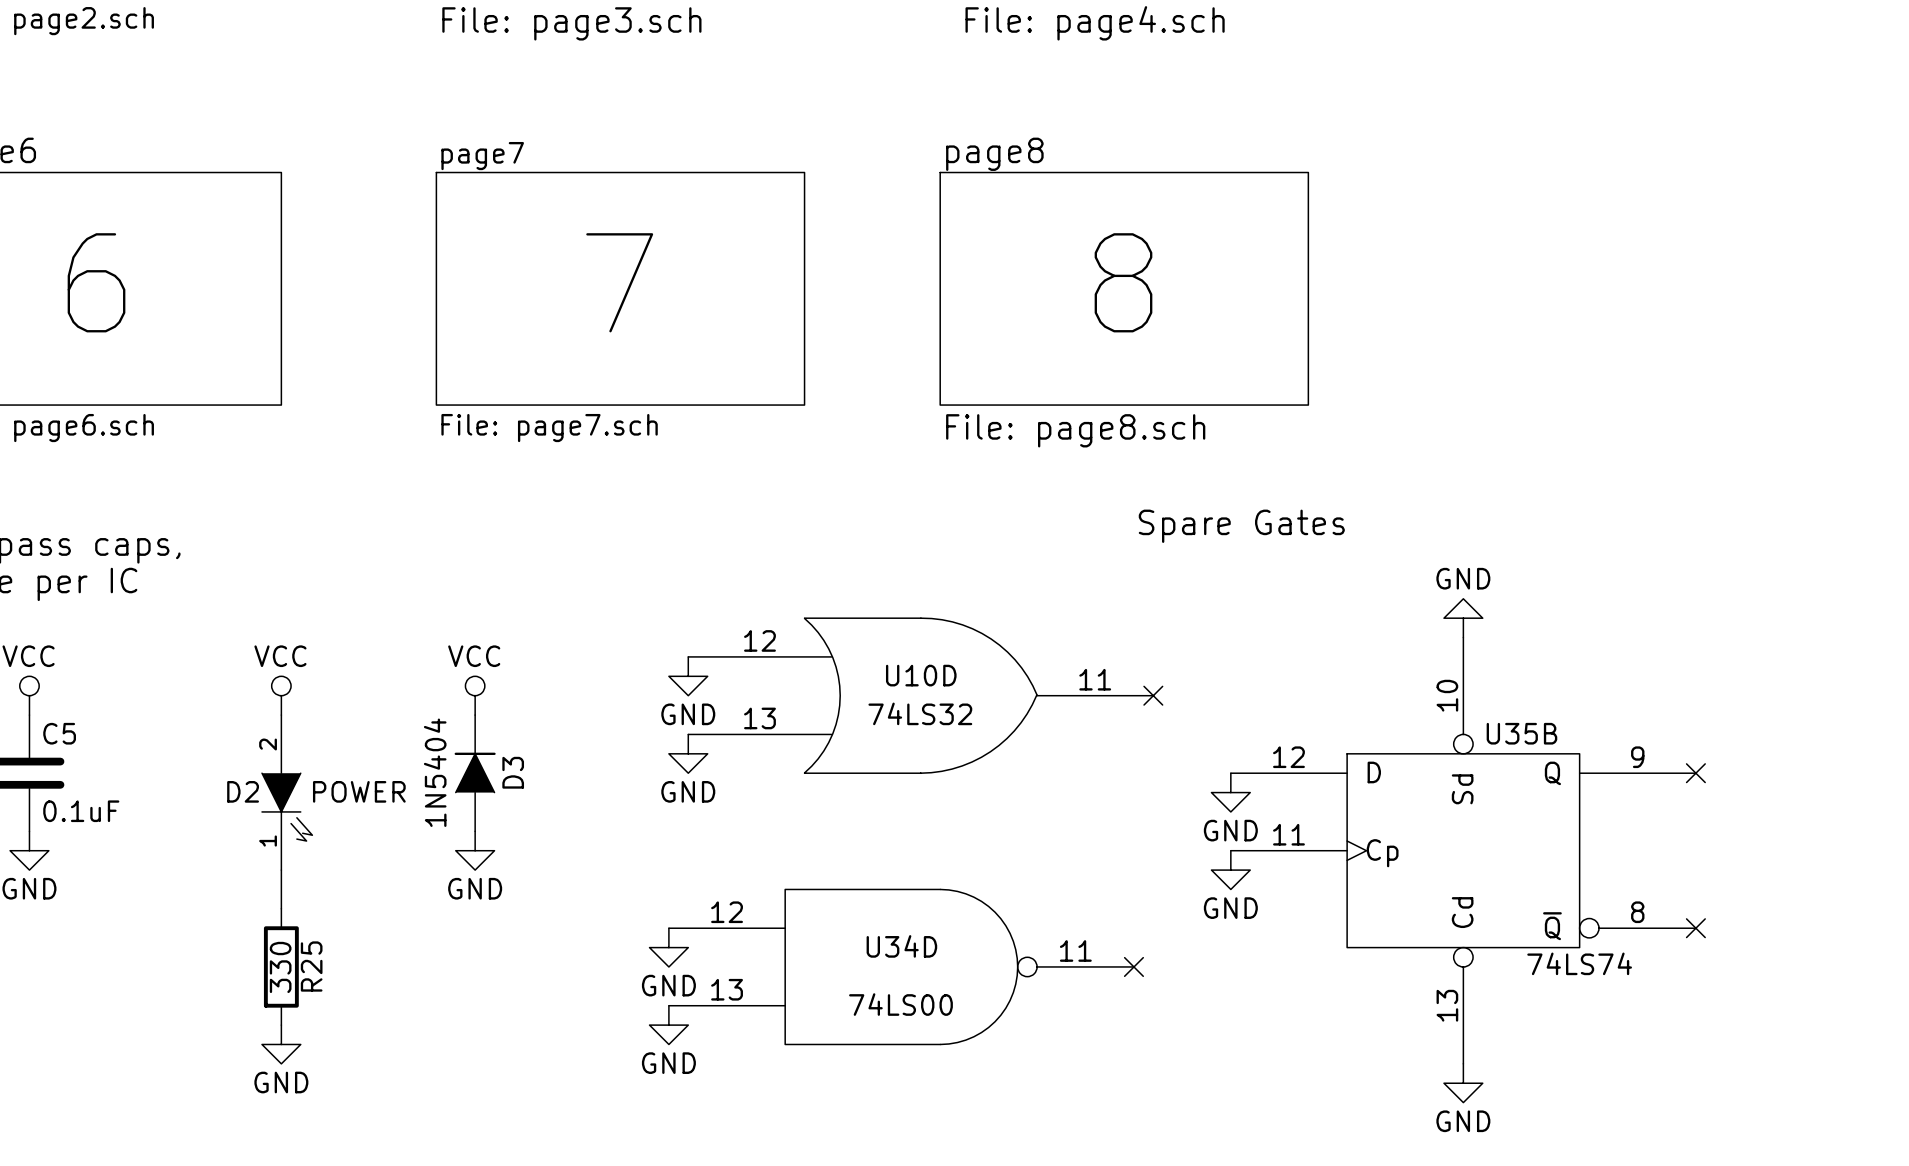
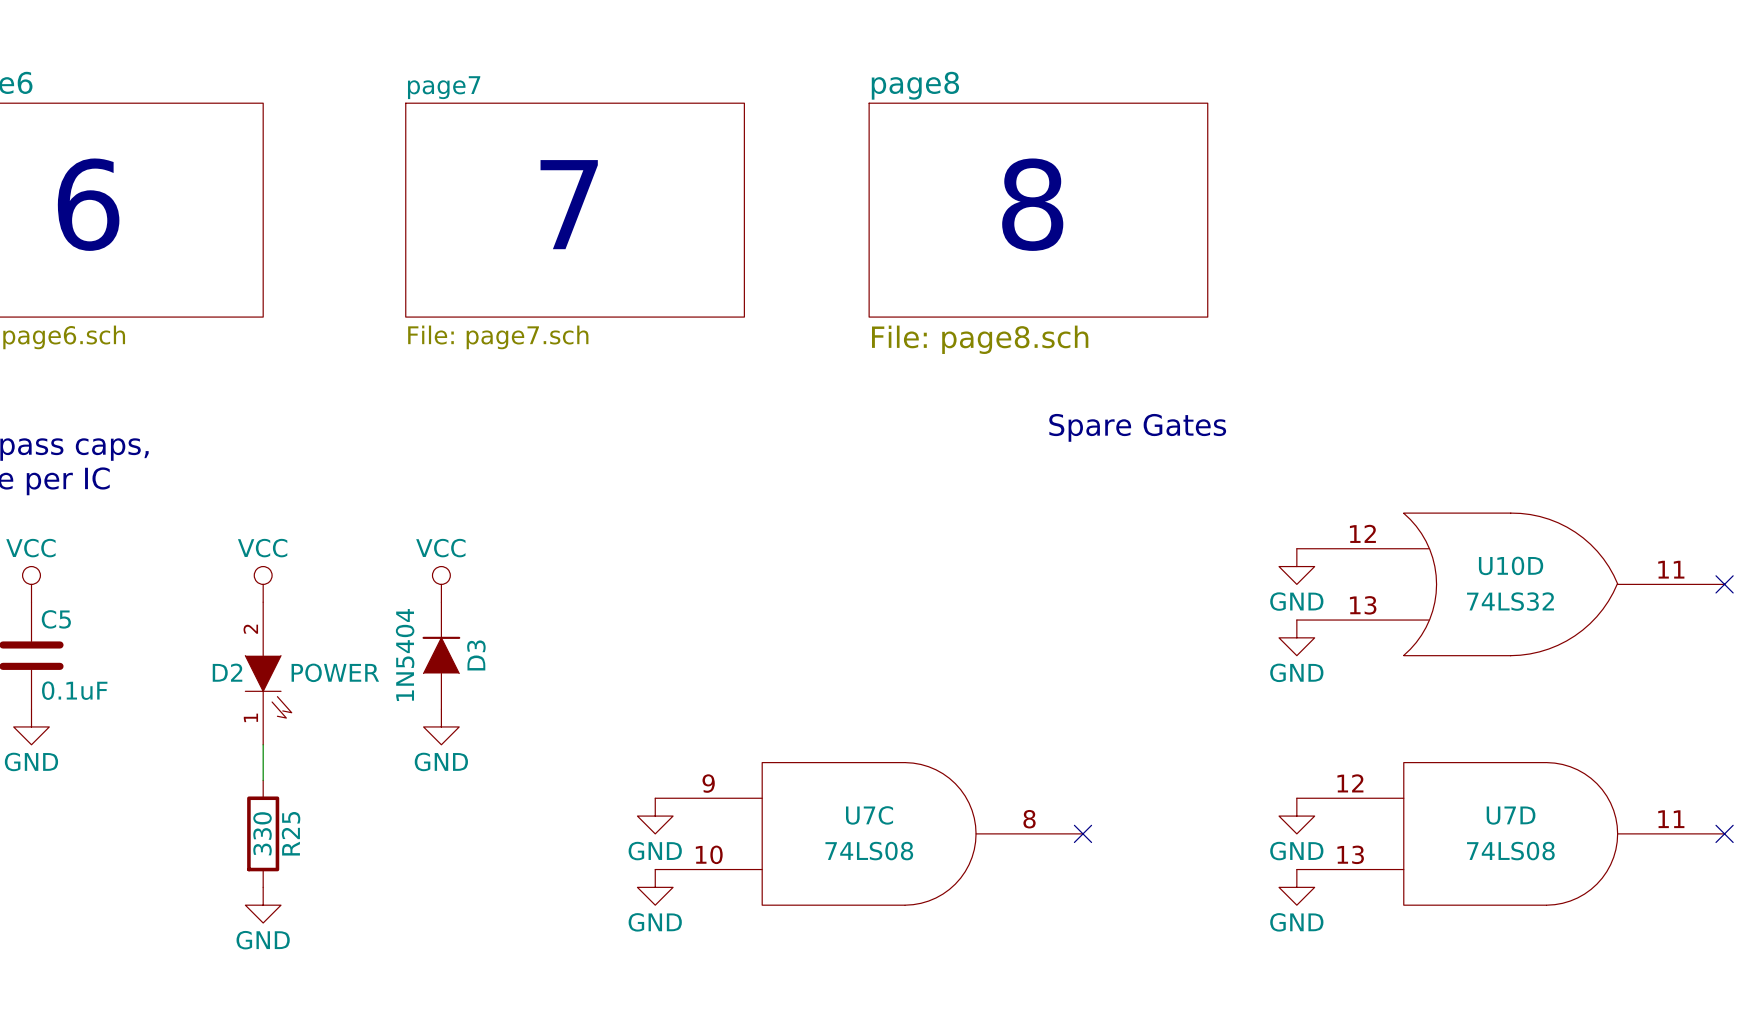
power symbol: GND (1463, 618) -> none
power symbol: GND (688, 676) -> none
power symbol: none -> GND (1296, 566)
U10D position: (920, 695) -> (1510, 584)
no-connect mark: (1153, 695) -> none
no-connect mark: none -> (1724, 584)
power symbol: GND (688, 753) -> none
power symbol: none -> GND (1296, 637)
no-connect mark: (1695, 773) -> none
power symbol: GND (1230, 792) -> none
U35B: 74LS74 (1463, 850) -> none
power symbol: GND (1230, 870) -> none
no-connect mark: (1695, 928) -> none
power symbol position: GND (668, 947) -> GND (655, 816)
power symbol: none -> GND (1296, 816)
U34D: 74LS00 (901, 966) -> none
U7C: none -> 74LS08 (869, 833)
no-connect mark position: (1133, 966) -> (1082, 833)
U7D: none -> 74LS08 (1510, 833)
no-connect mark: none -> (1724, 833)
power symbol position: GND (668, 1025) -> GND (655, 887)
power symbol: none -> GND (1296, 887)
power symbol: GND (1463, 1083) -> none

